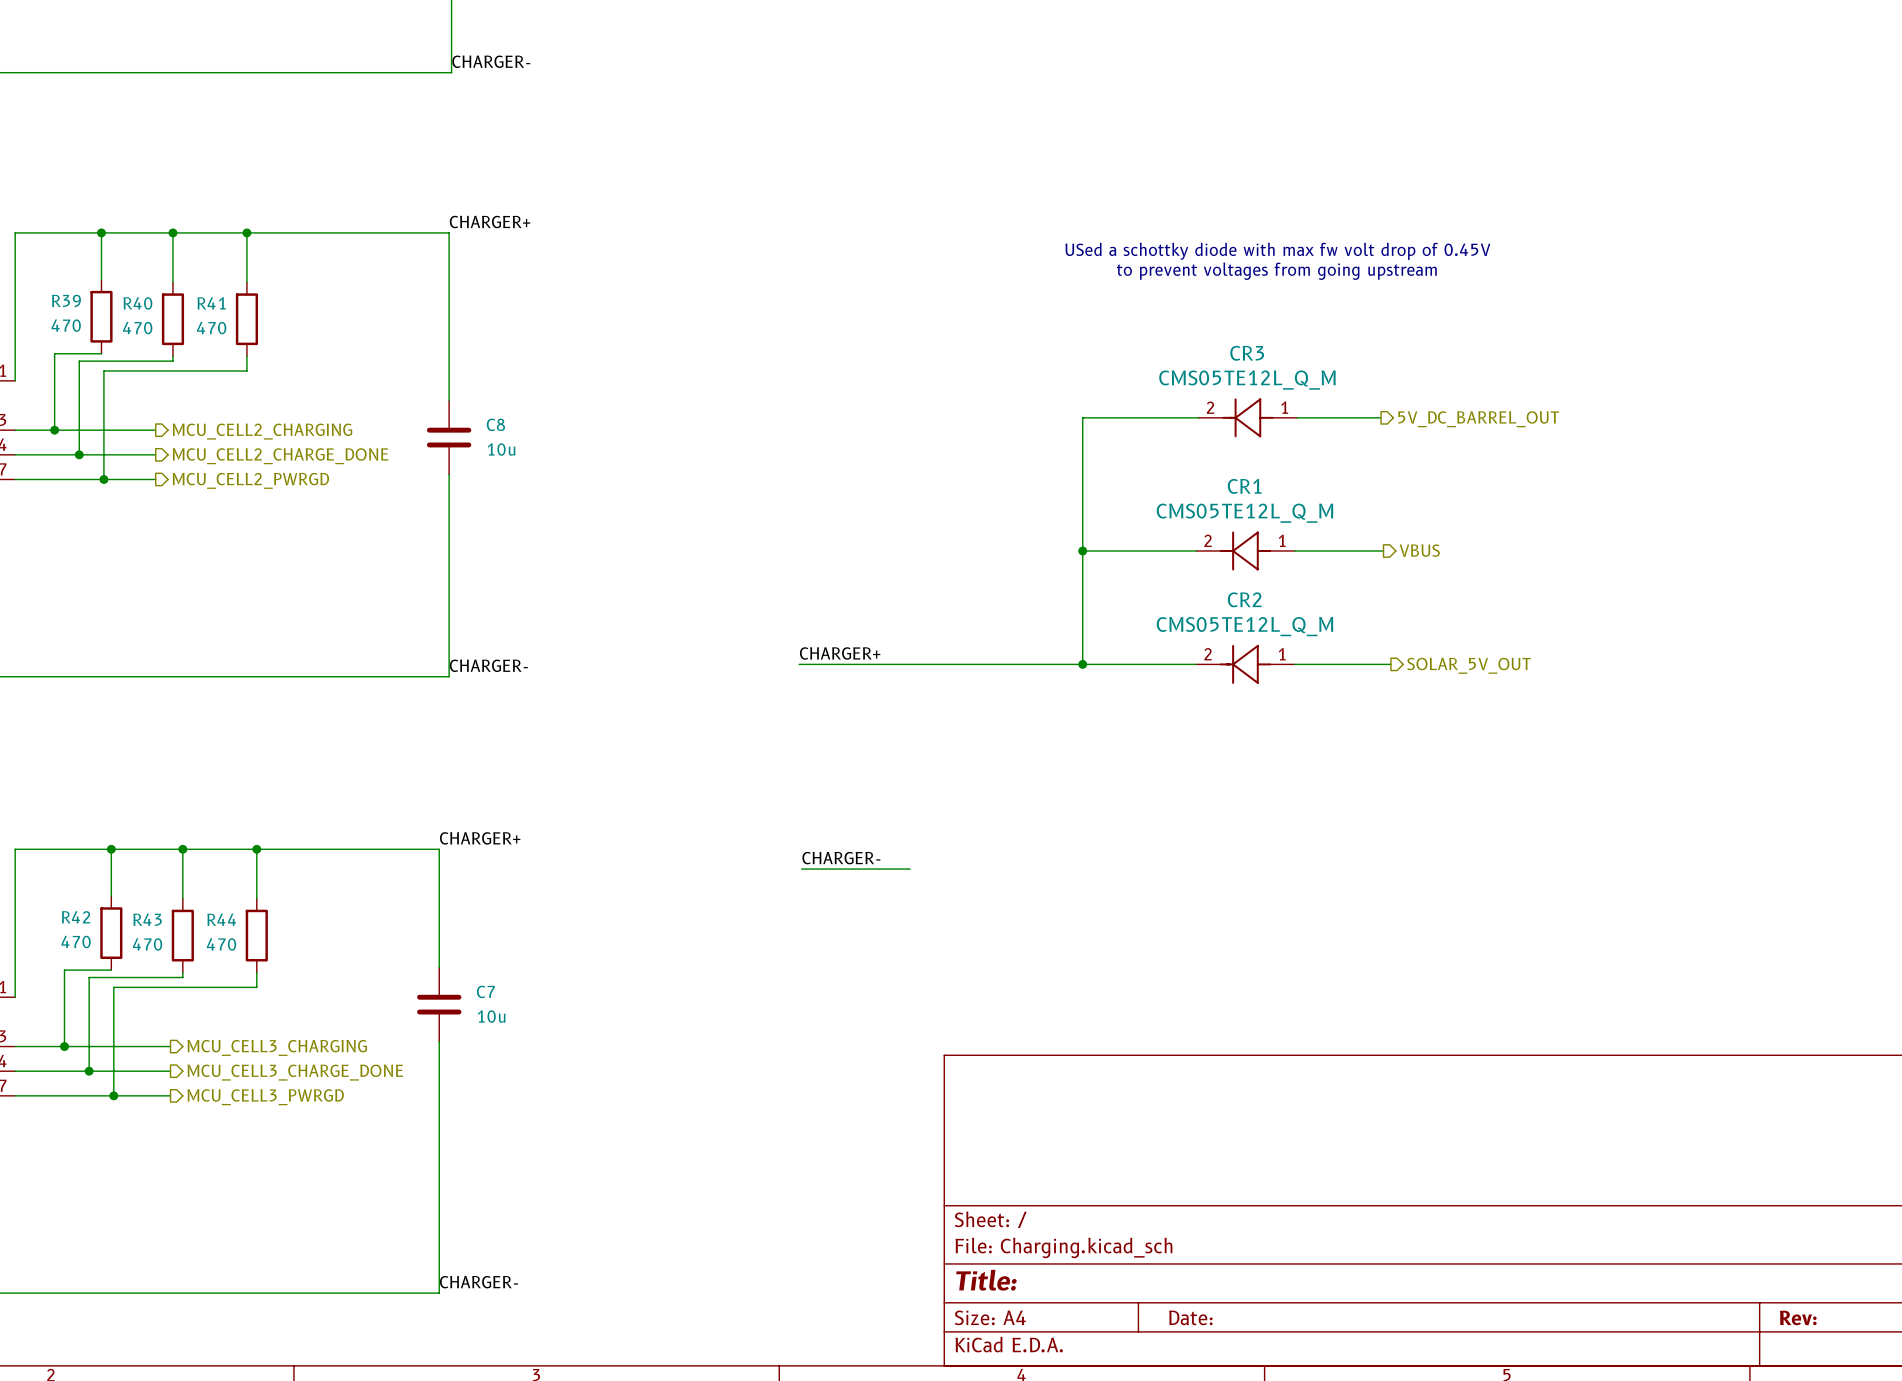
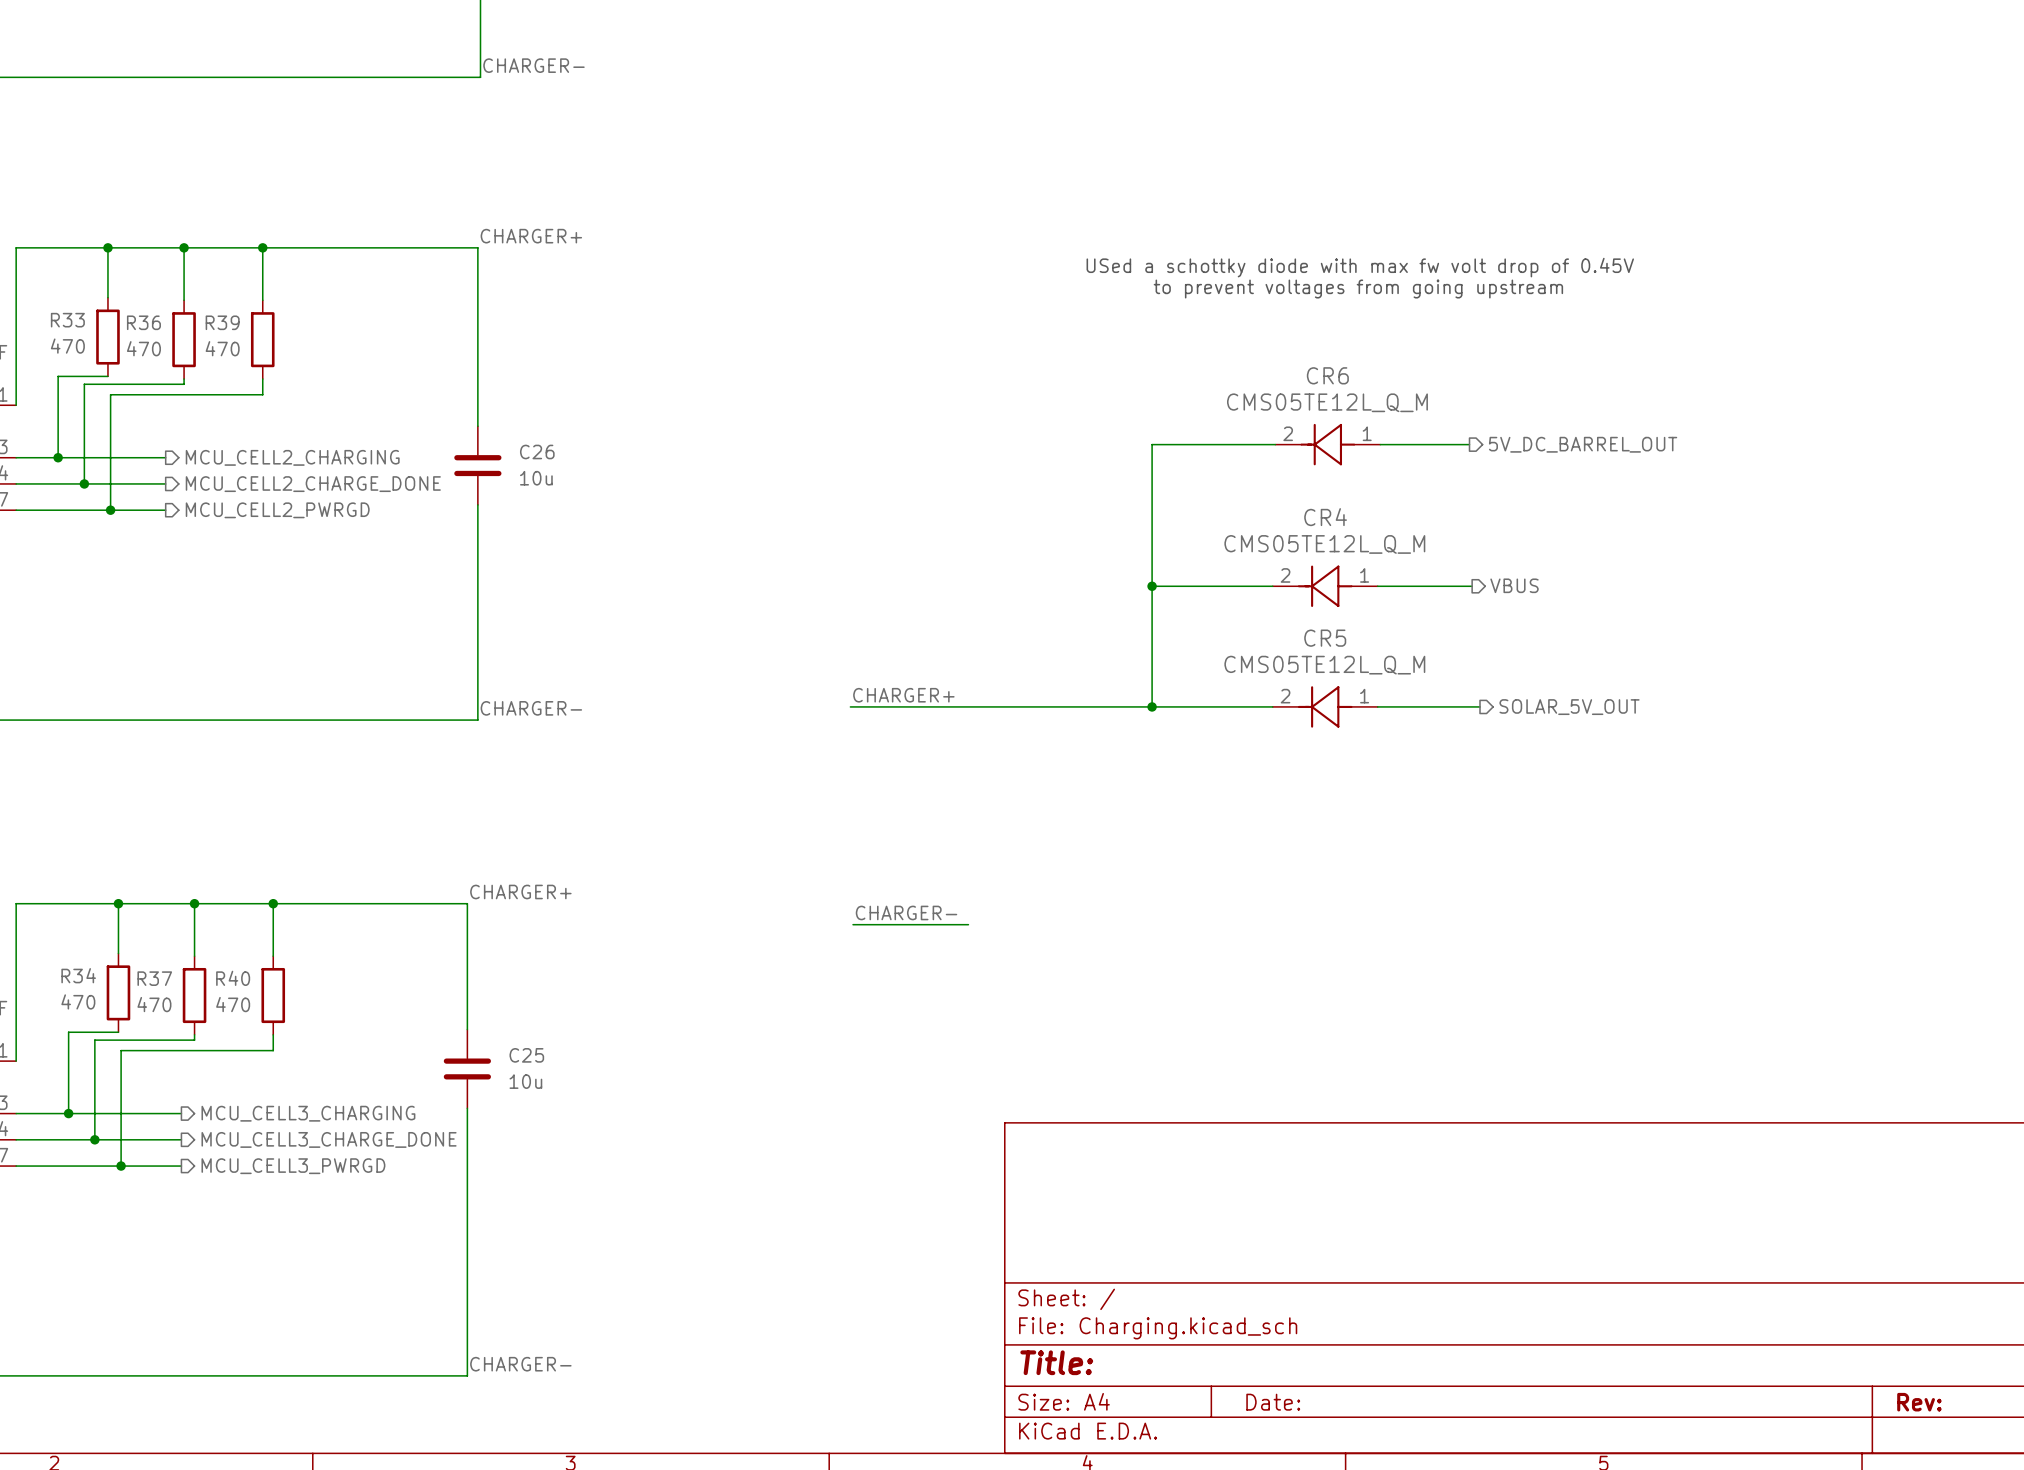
R39 name: R39 (66, 300) -> R33 (67, 320)
R40 name: R40 (137, 303) -> R36 (143, 322)
R41 name: R41 (211, 303) -> R39 (222, 322)
CR3 name: CR3 (1247, 353) -> CR6 (1327, 375)
C8 name: C8 (495, 424) -> C26 (537, 451)
CR1 name: CR1 (1244, 486) -> CR4 (1325, 517)
CR2 name: CR2 (1244, 599) -> CR5 (1325, 638)
R42 name: R42 (76, 917) -> R34 (78, 975)
R43 name: R43 (147, 919) -> R37 (154, 978)
R44 name: R44 (221, 919) -> R40 (233, 978)
C7 name: C7 (485, 991) -> C25 (526, 1055)

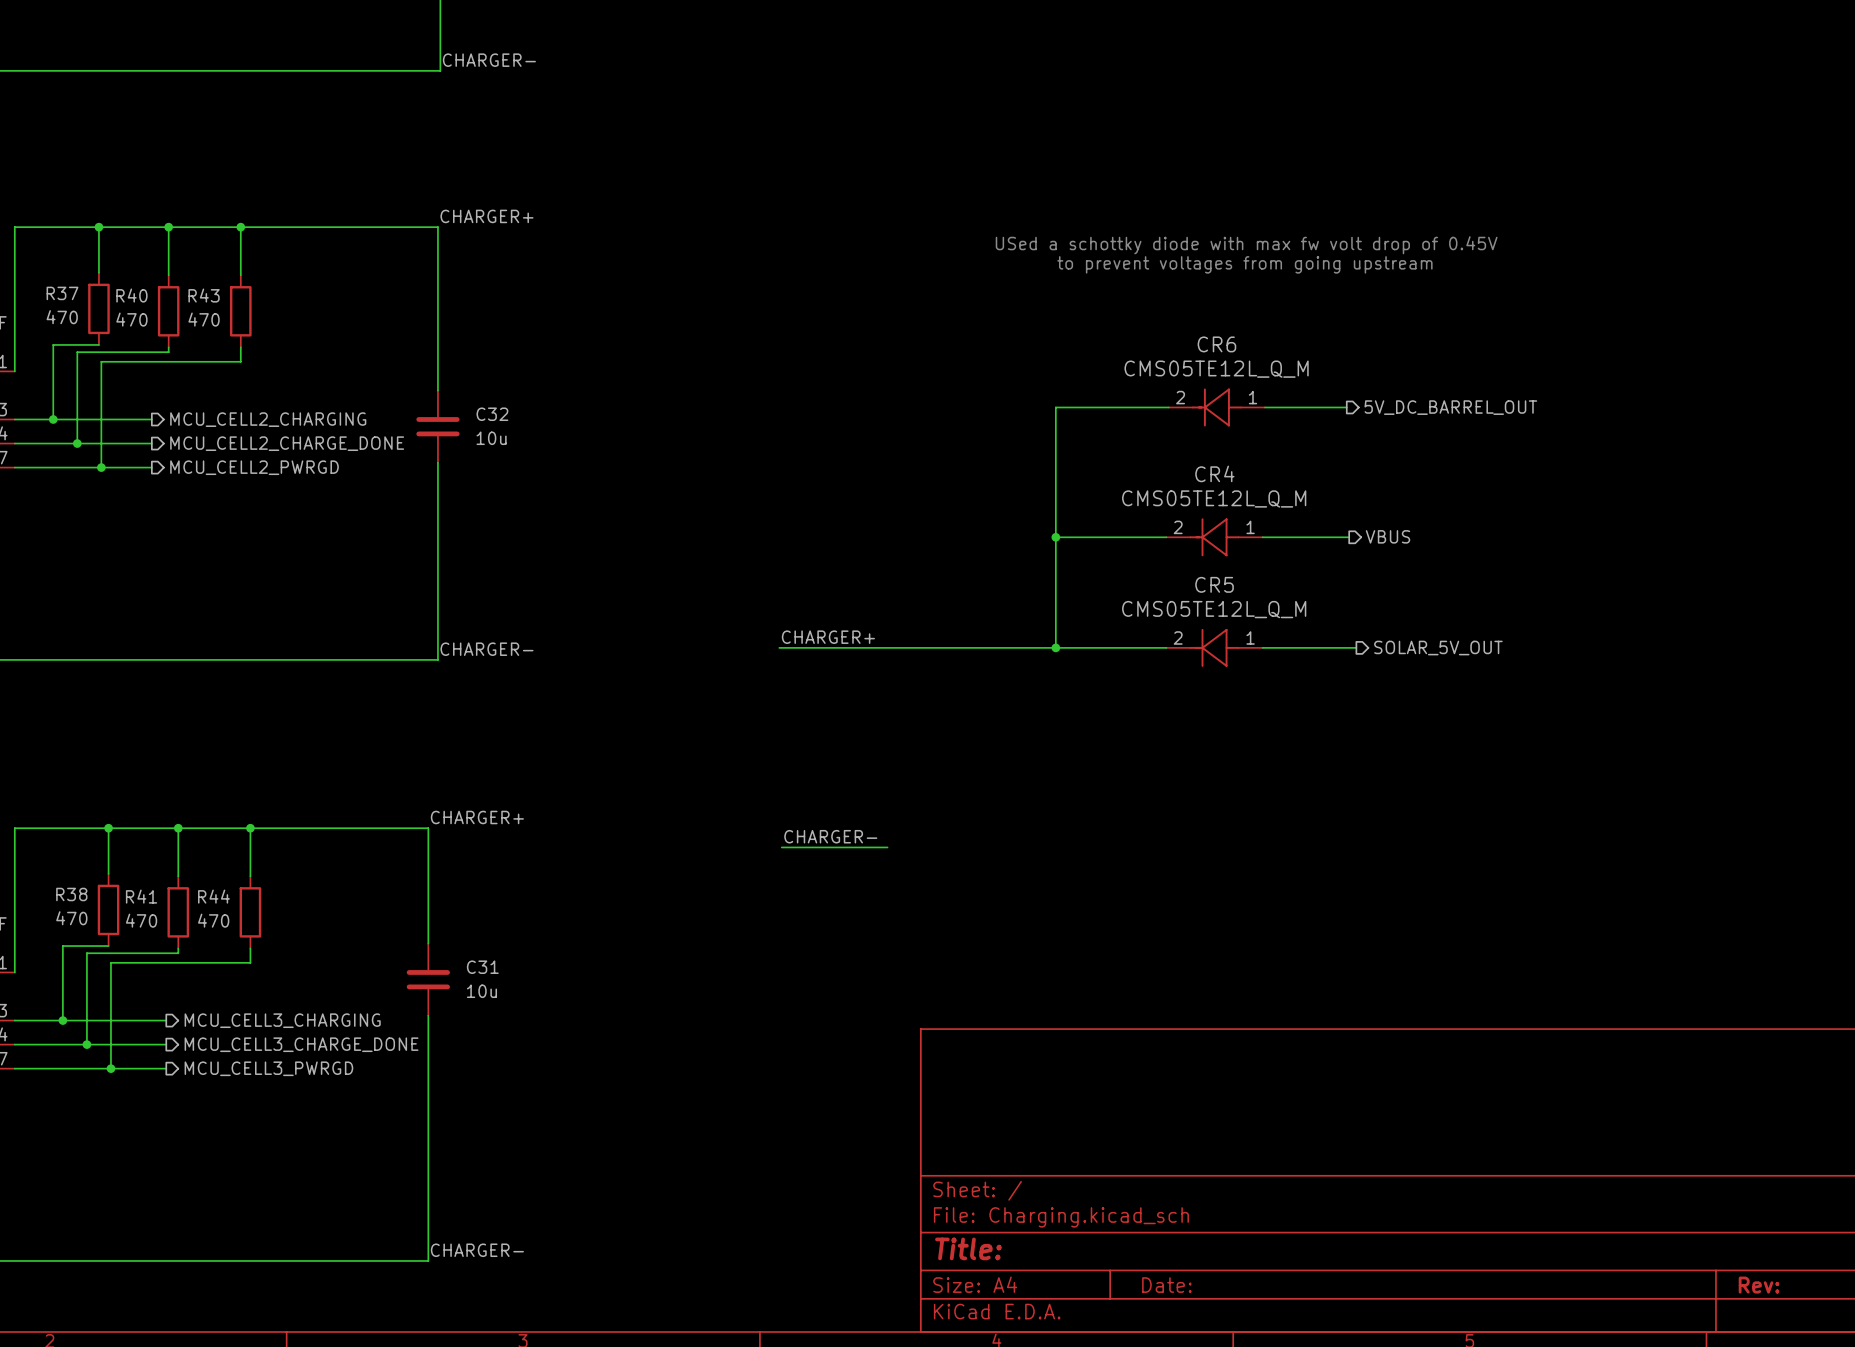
R33 name: R33 (67, 320) -> R37 (62, 293)
R36 name: R36 (143, 322) -> R40 (131, 295)
R39 name: R39 (222, 322) -> R43 (204, 295)
C26 name: C26 (537, 451) -> C32 (492, 414)
R34 name: R34 (78, 975) -> R38 (71, 894)
R37 name: R37 (154, 978) -> R41 (141, 896)
R40 name: R40 (233, 978) -> R44 (213, 896)
C25 name: C25 (526, 1055) -> C31 (482, 967)

